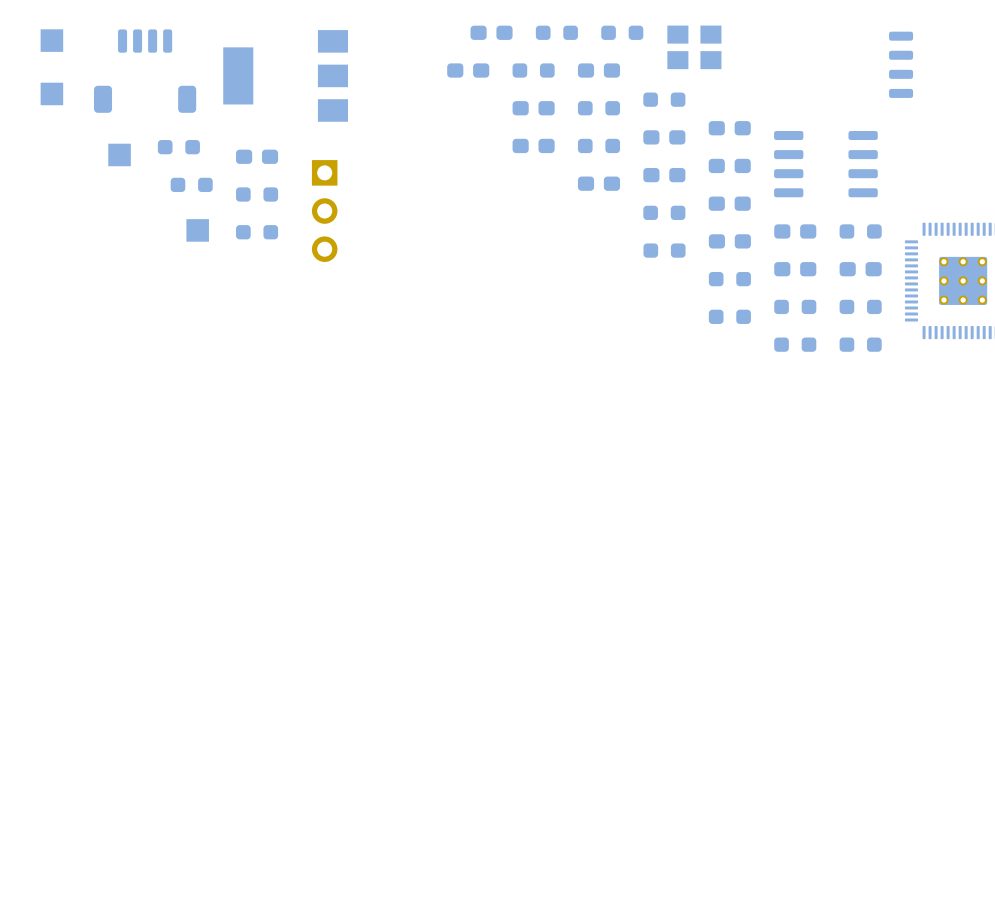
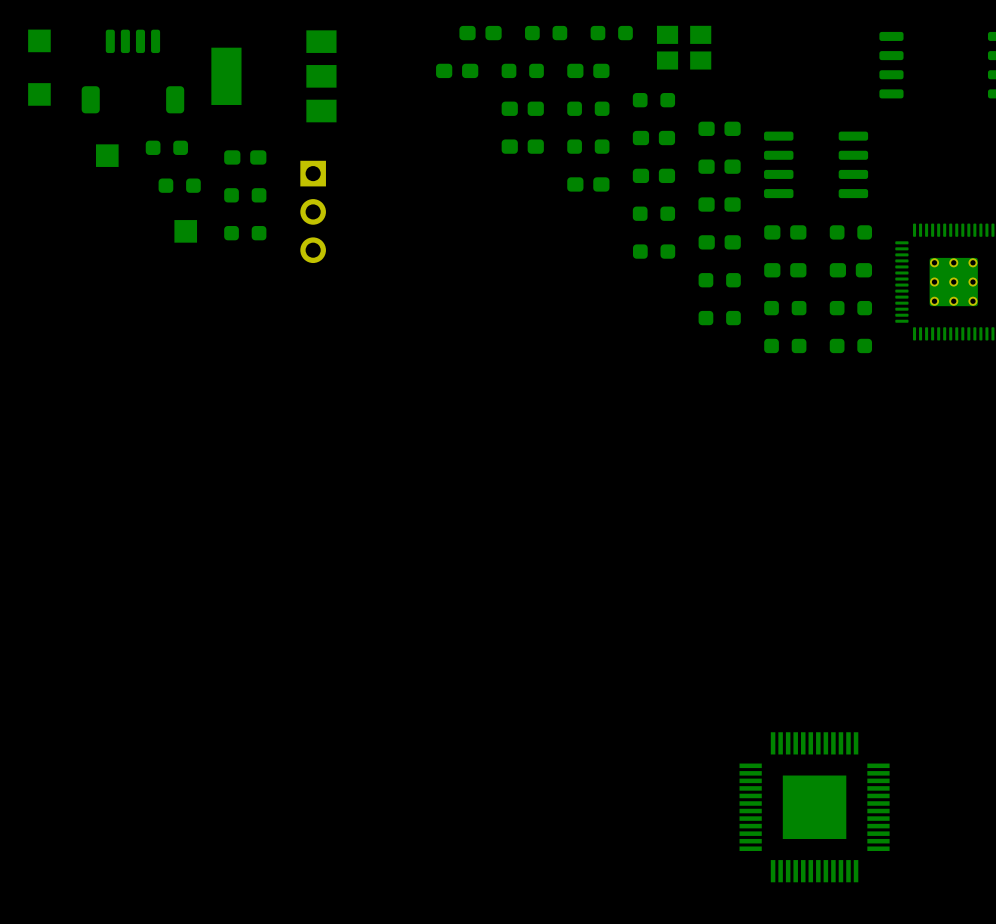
part: none -> (814, 807)

